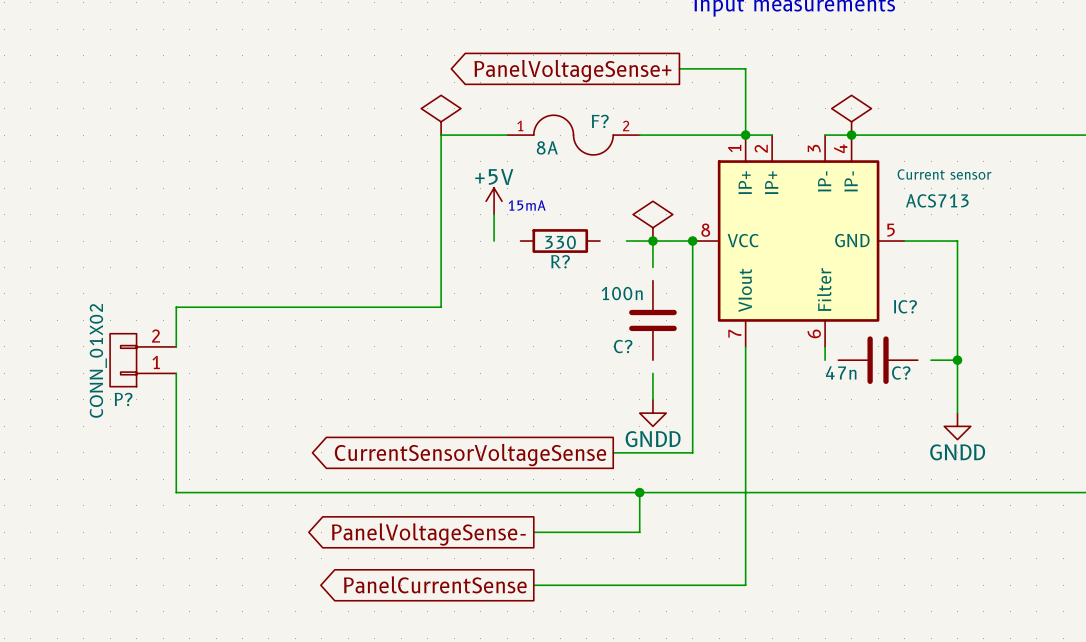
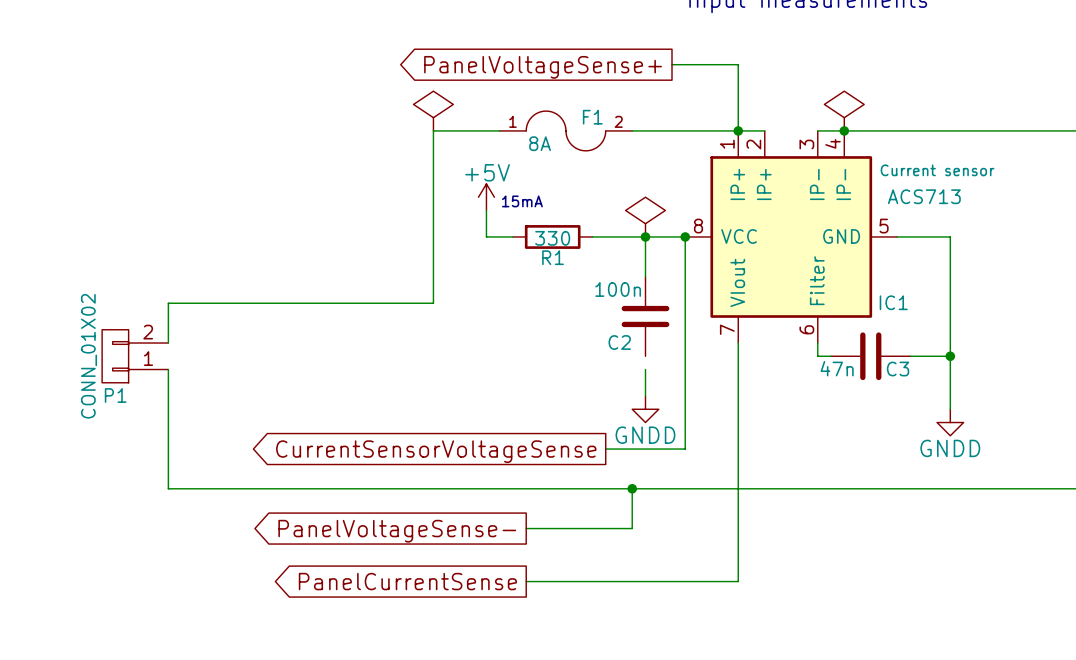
F? name: F? (600, 121) -> F1 (592, 117)
wire: none -> (486, 236) (512, 236)
wire: none -> (592, 236) (618, 236)
R? name: R? (560, 261) -> R1 (553, 257)
wire: none -> (645, 263) (645, 276)
IC? name: IC? (905, 306) -> IC1 (893, 302)
C? name: C? (623, 346) -> C2 (619, 342)
wire: none -> (817, 356) (831, 356)
wire: none -> (910, 356) (923, 356)
C? name: C? (901, 373) -> C3 (898, 369)
P? name: P? (123, 399) -> P1 (115, 395)

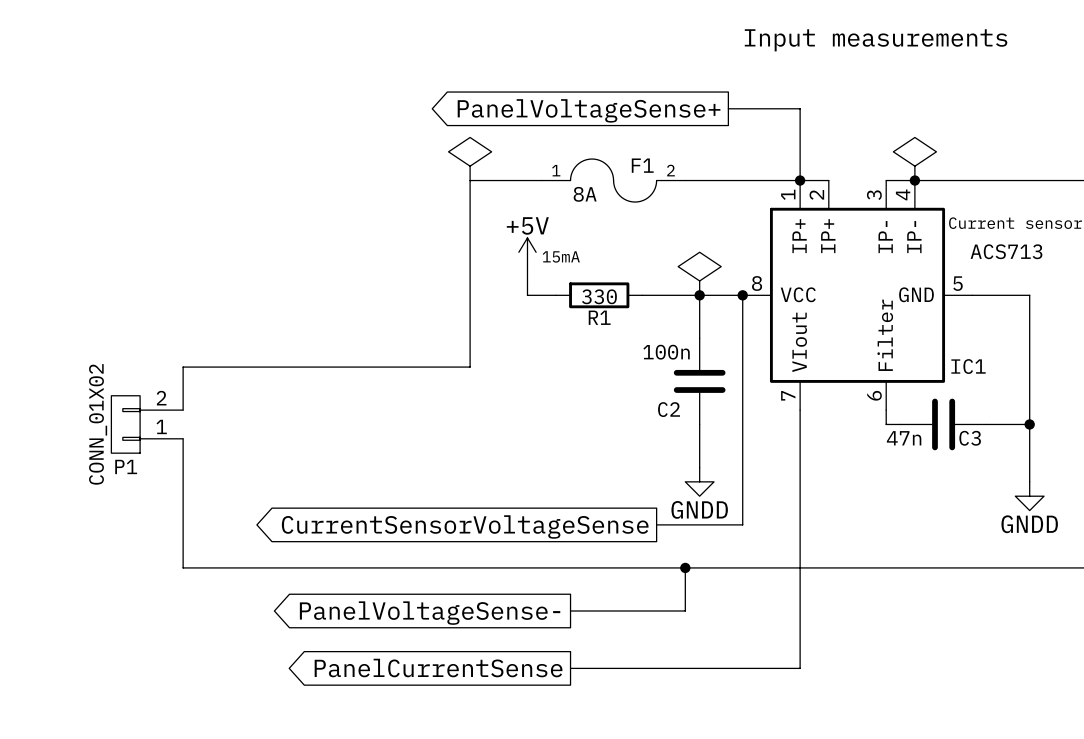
wire: none -> (699, 424) (699, 438)

